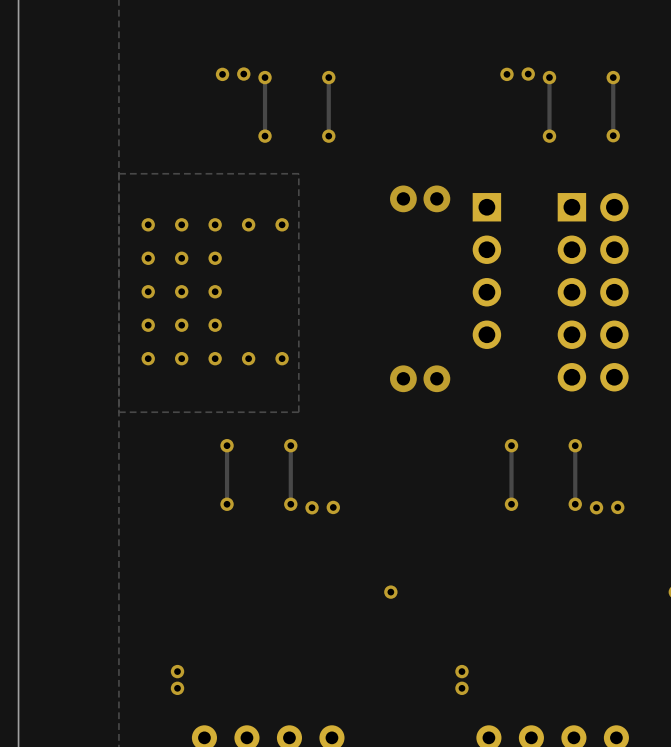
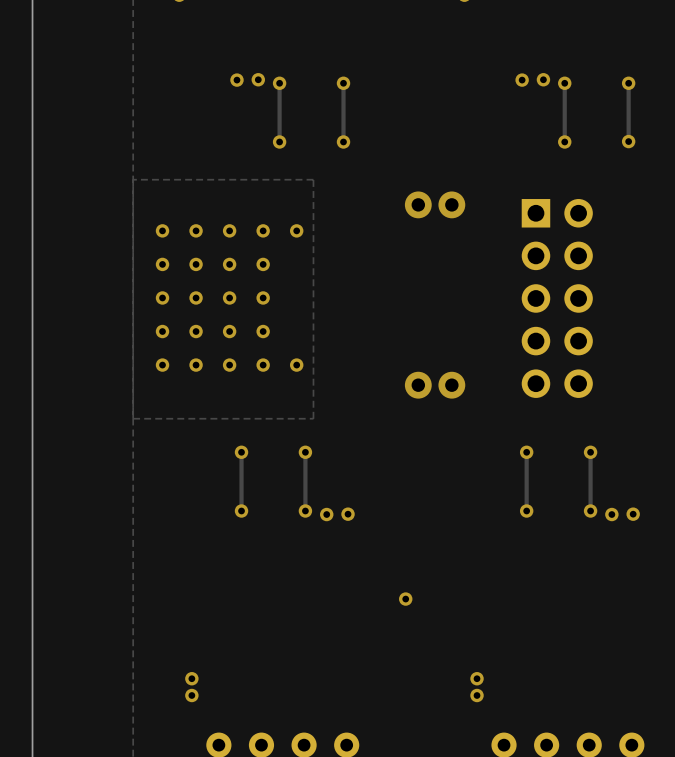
via: none -> (263, 264)
part: (486, 271) -> none
via: none -> (263, 297)
part position: (593, 292) -> (557, 298)
via: none -> (263, 331)

